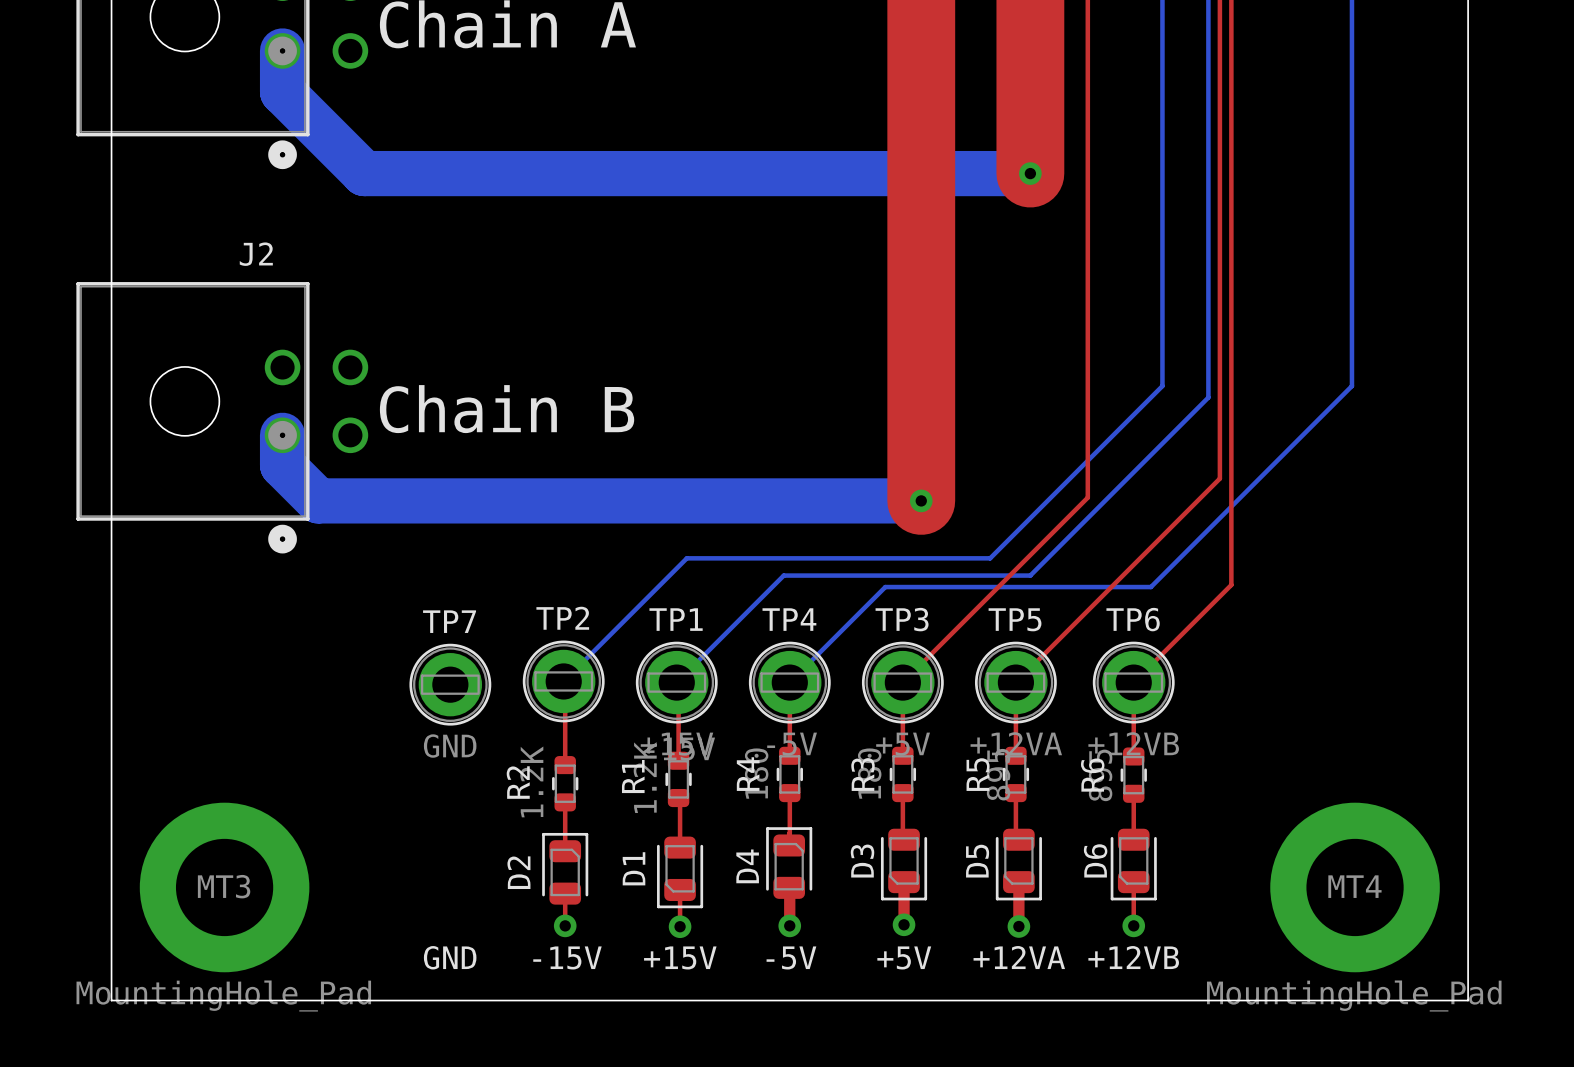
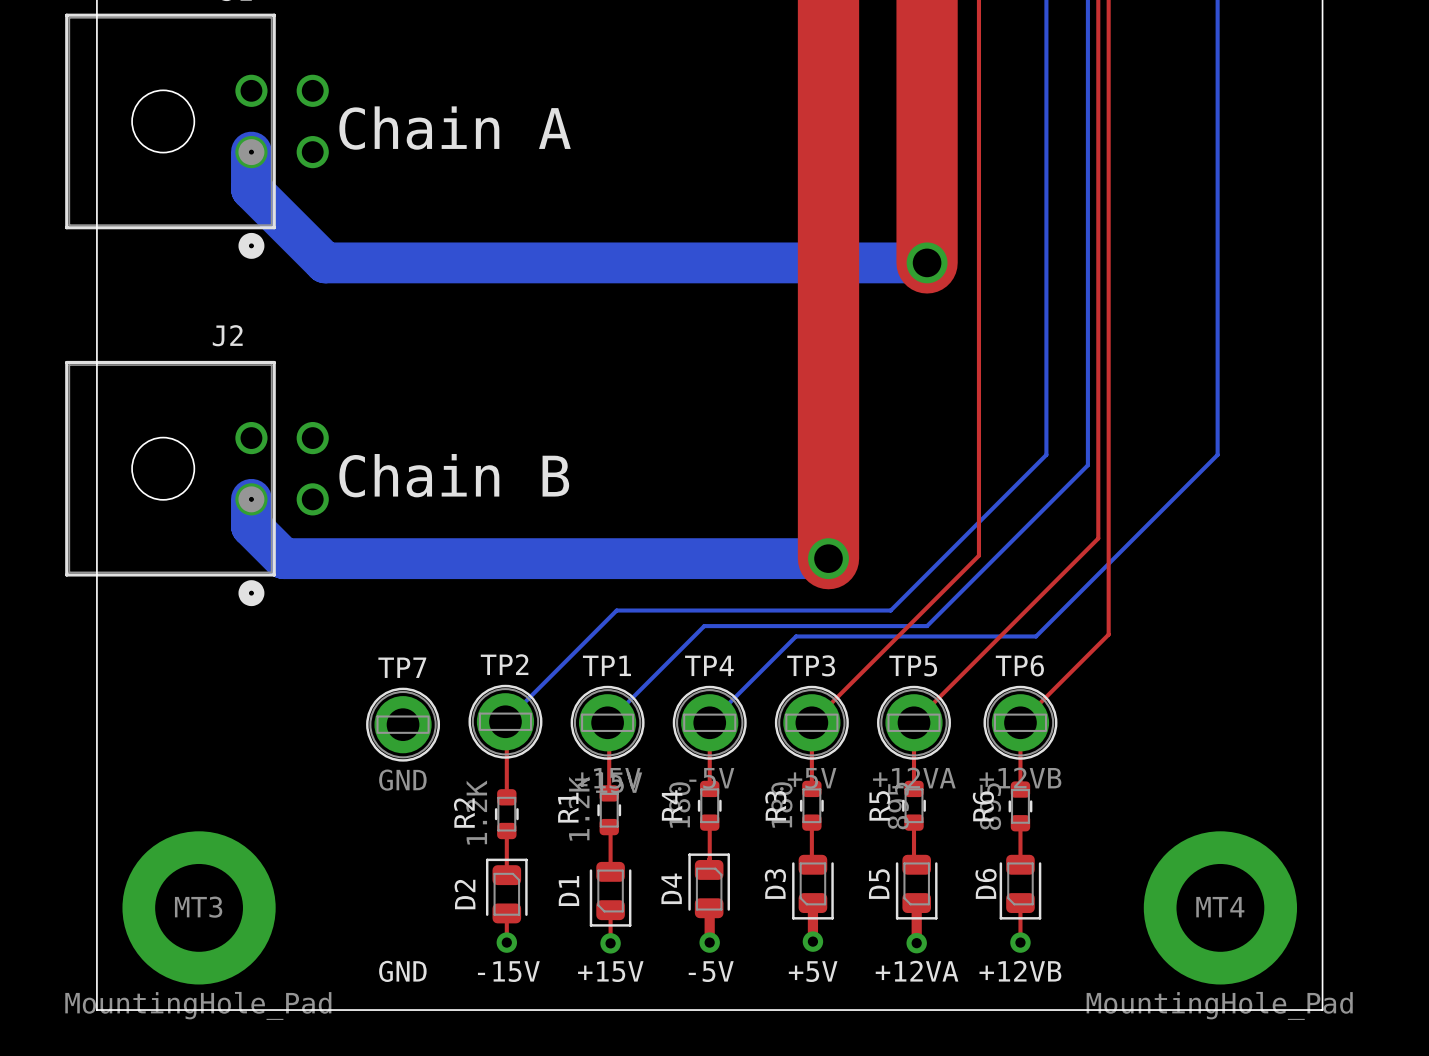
via size: [1019, 162, 1042, 185] -> [906, 242, 948, 284]
via size: [909, 489, 933, 513] -> [808, 538, 849, 580]

